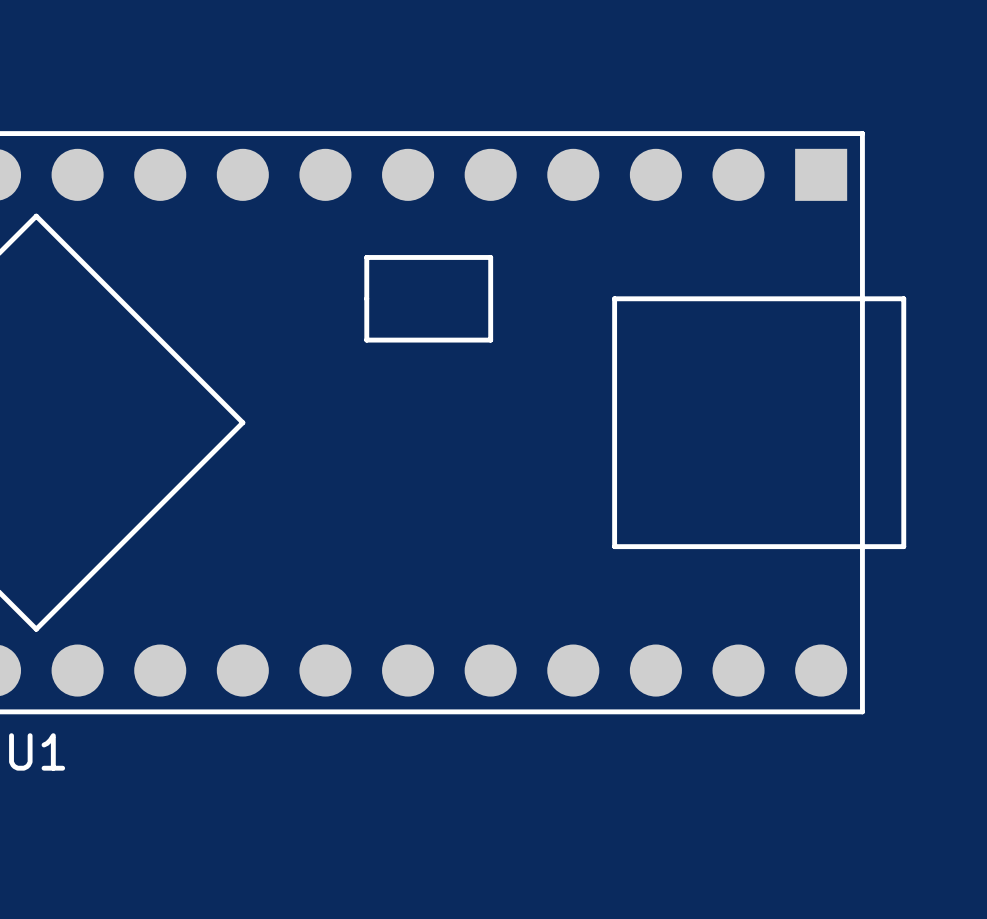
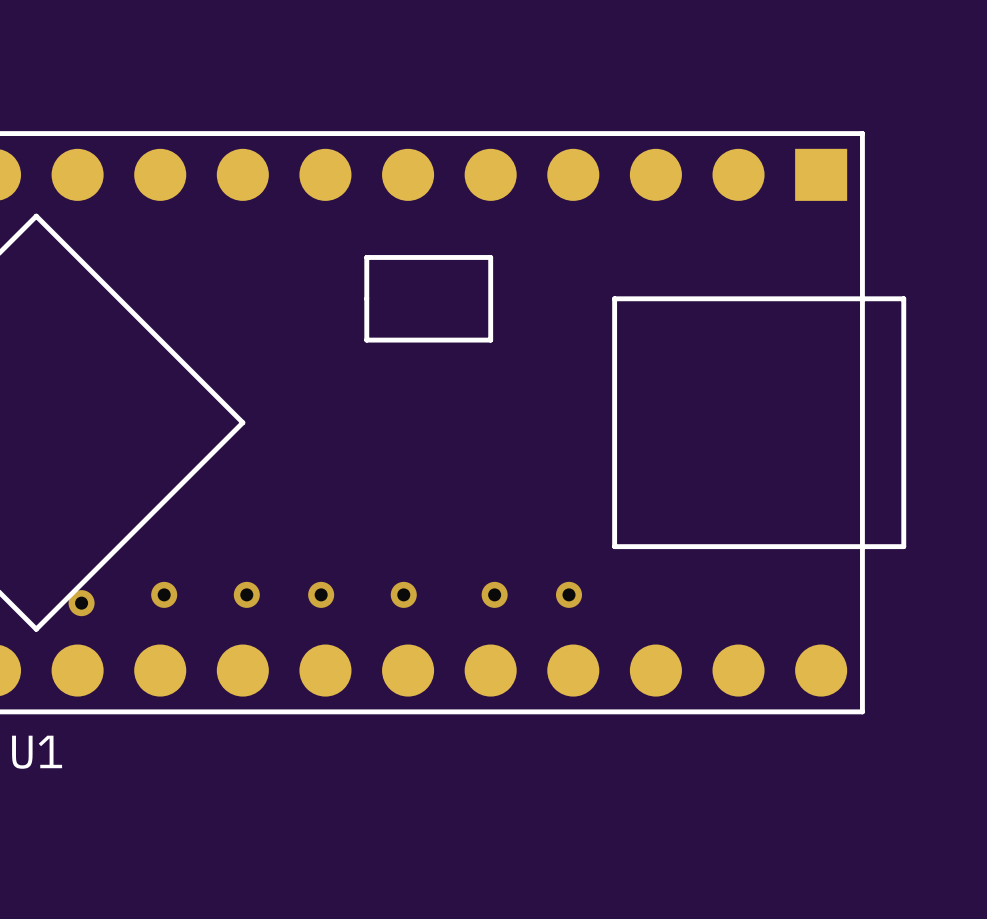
via: none -> (164, 594)
via: none -> (246, 594)
via: none -> (321, 594)
via: none -> (403, 594)
via: none -> (494, 594)
via: none -> (569, 594)
via: none -> (81, 603)

